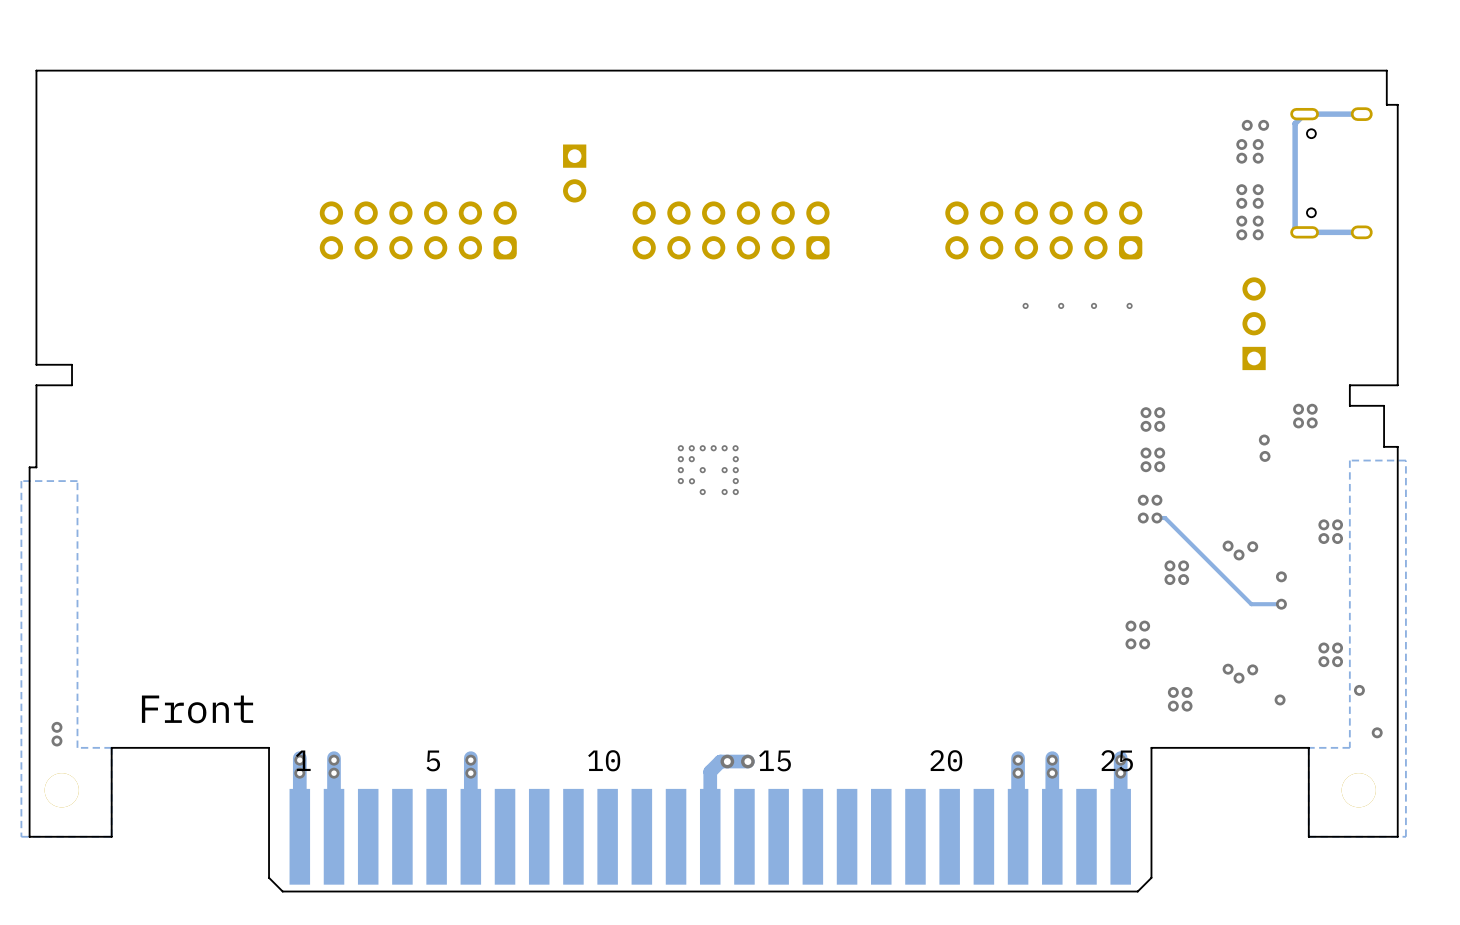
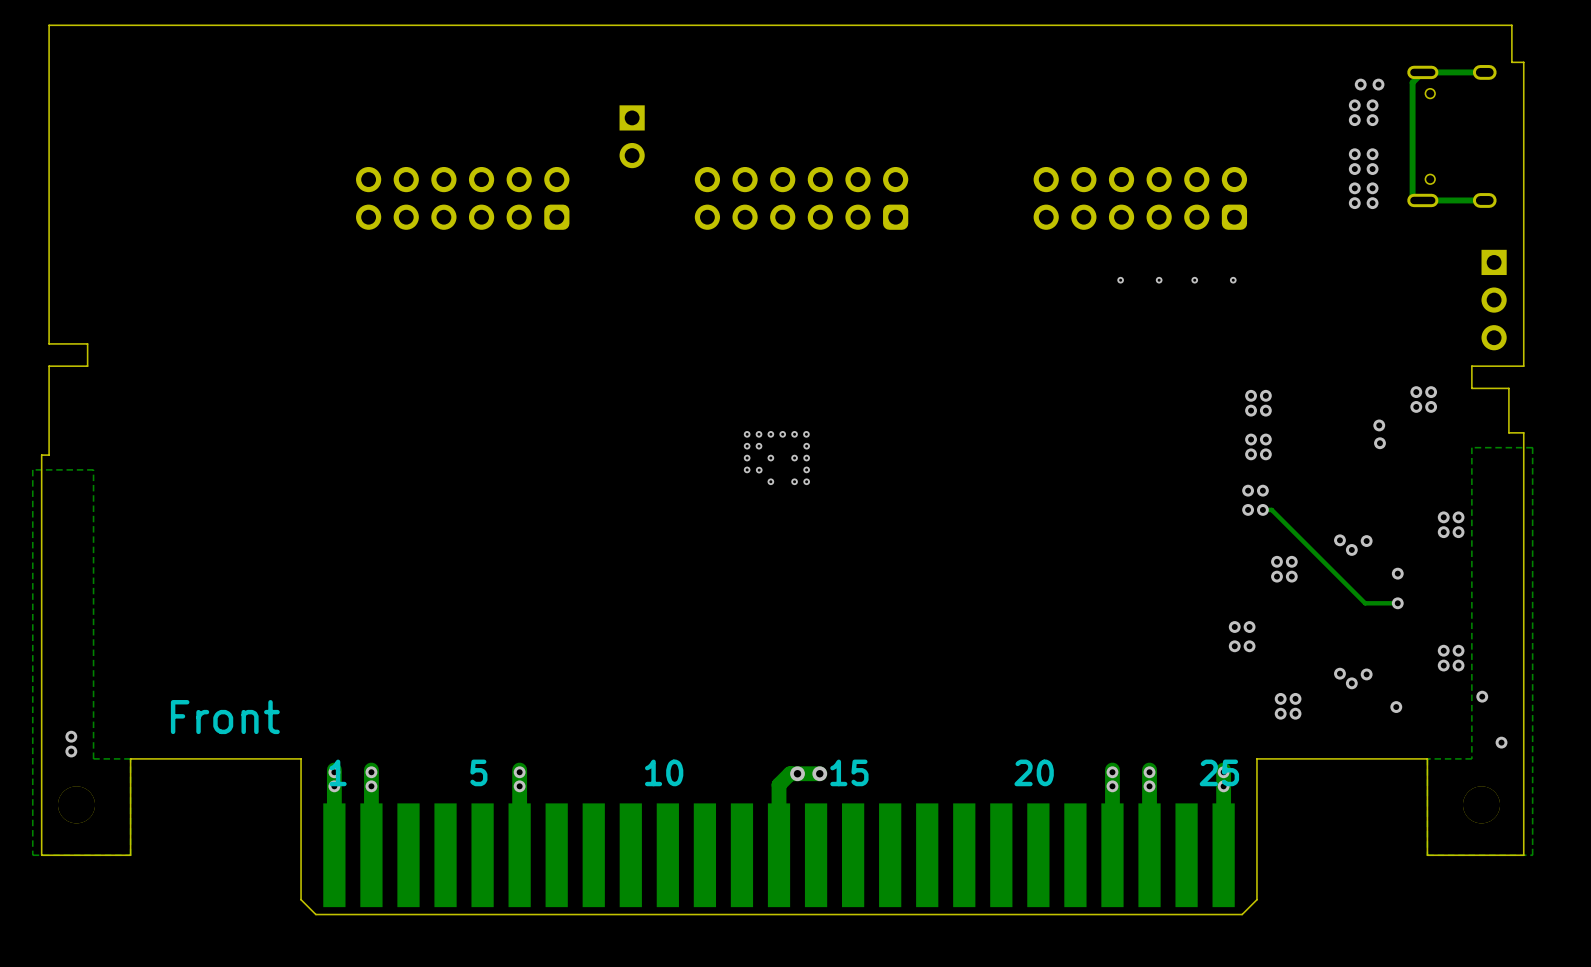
part rotation: 0° (1254, 323) -> 180° (1494, 300)
part position: (1254, 323) -> (1494, 300)

